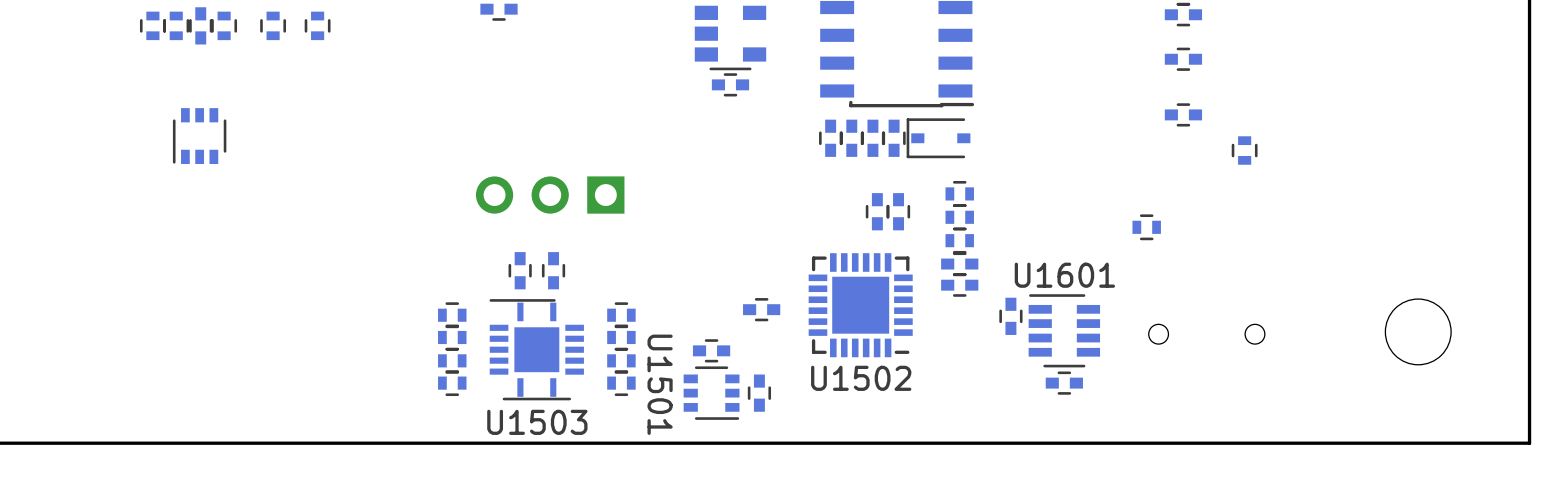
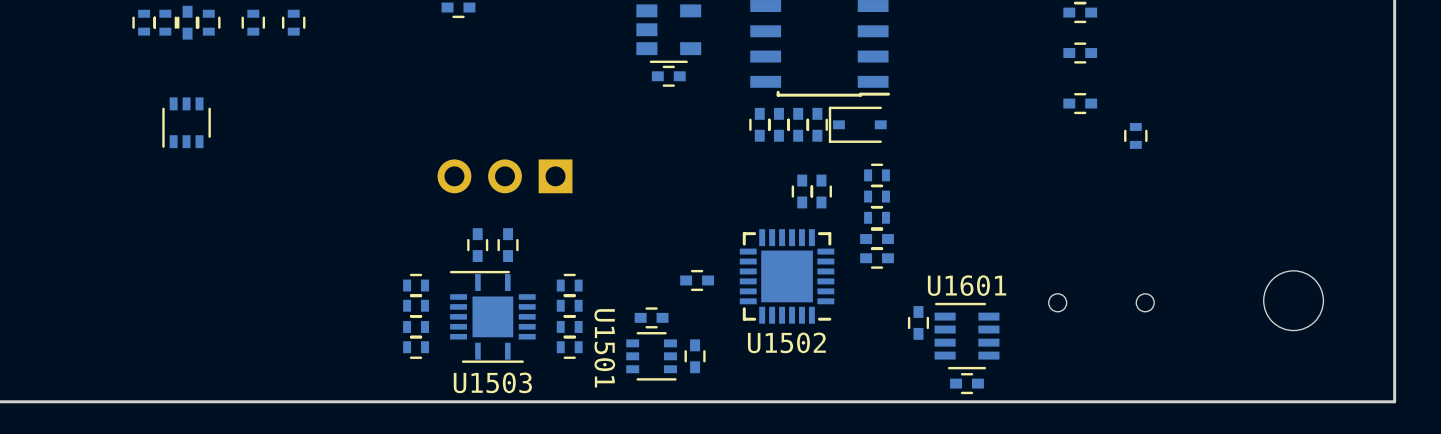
part: (1146, 227) -> none
part: (1010, 316) -> none
U1601 position: (1064, 330) -> (967, 336)
part: none -> (918, 322)
part: (1064, 383) -> none
part: none -> (967, 383)

